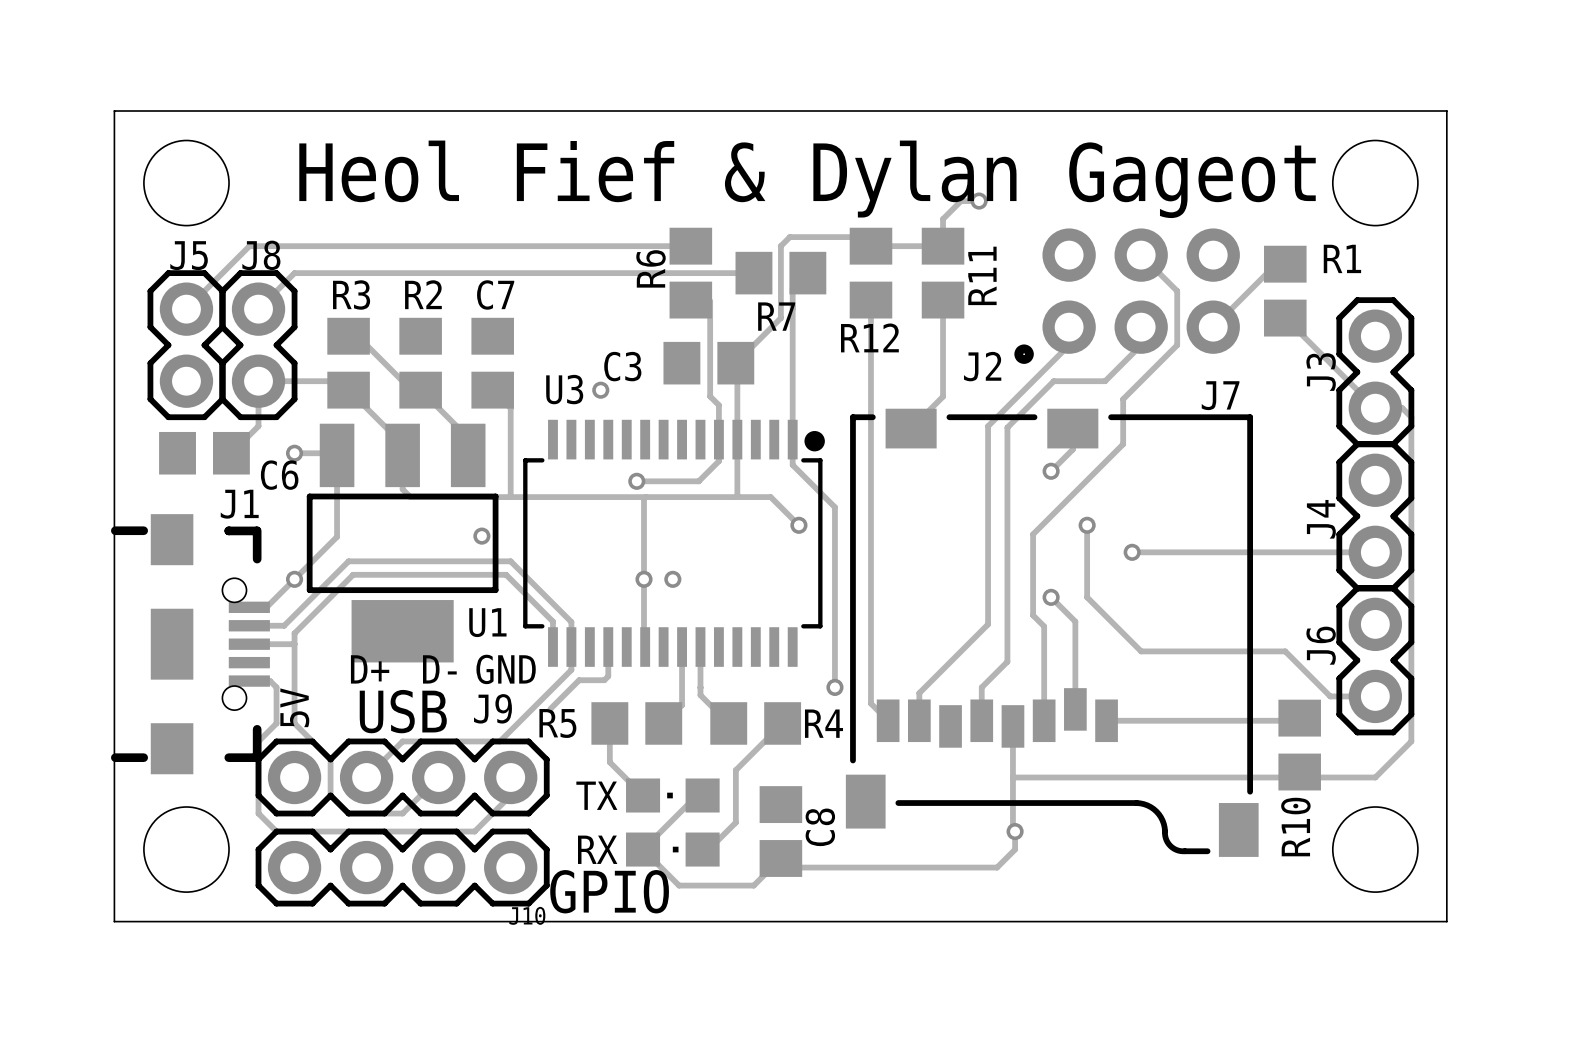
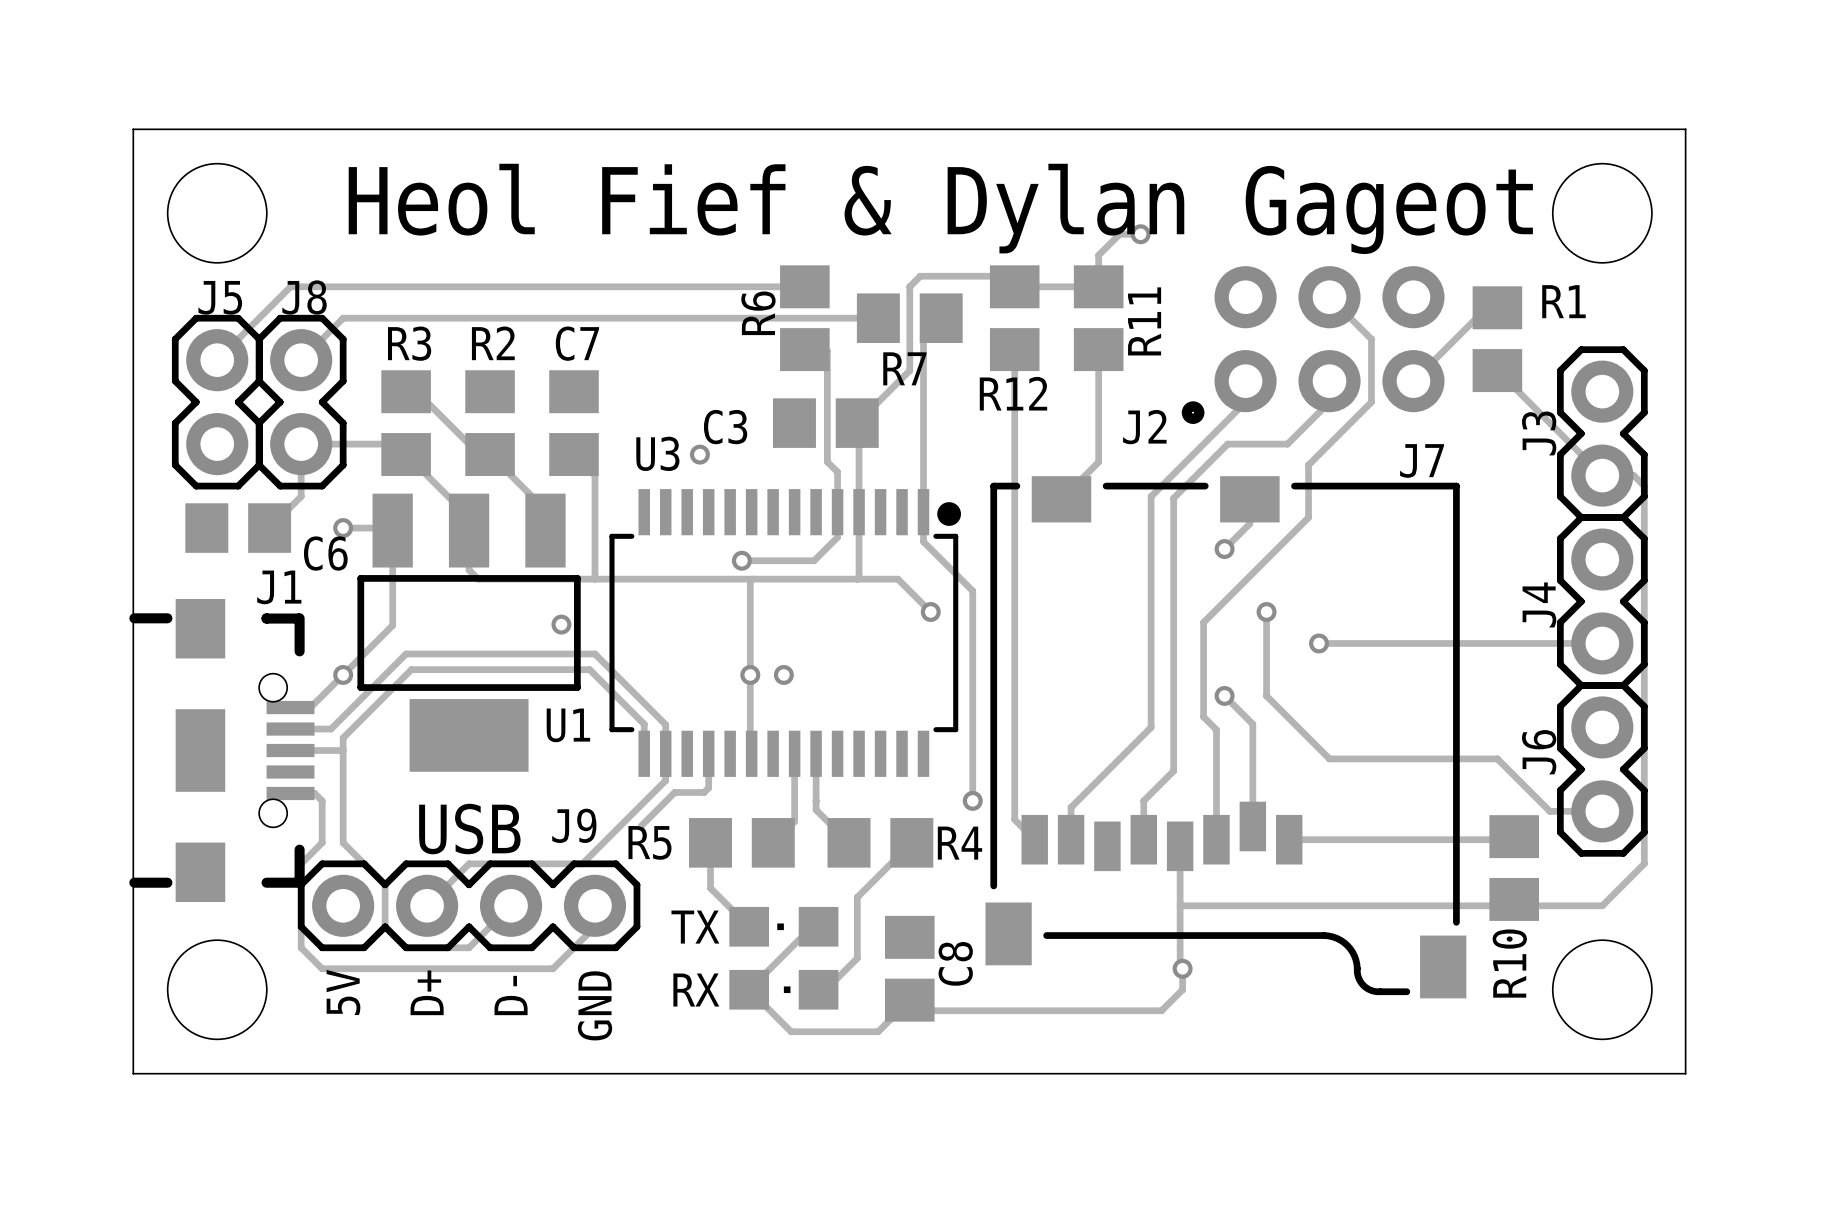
text rotation: 0° (370, 669) -> 90° counterclockwise (427, 992)
text position: D+ (370, 669) -> D+ (427, 992)
text rotation: 0° (439, 669) -> 90° counterclockwise (511, 995)
text position: D- (439, 669) -> D- (511, 995)
text rotation: 0° (506, 669) -> 90° counterclockwise (595, 1005)
text position: GND (506, 669) -> GND (595, 1005)
text position: 5V (294, 707) -> 5V (343, 992)
J10: (402, 867) -> none
text: GPIO (609, 891) -> none

